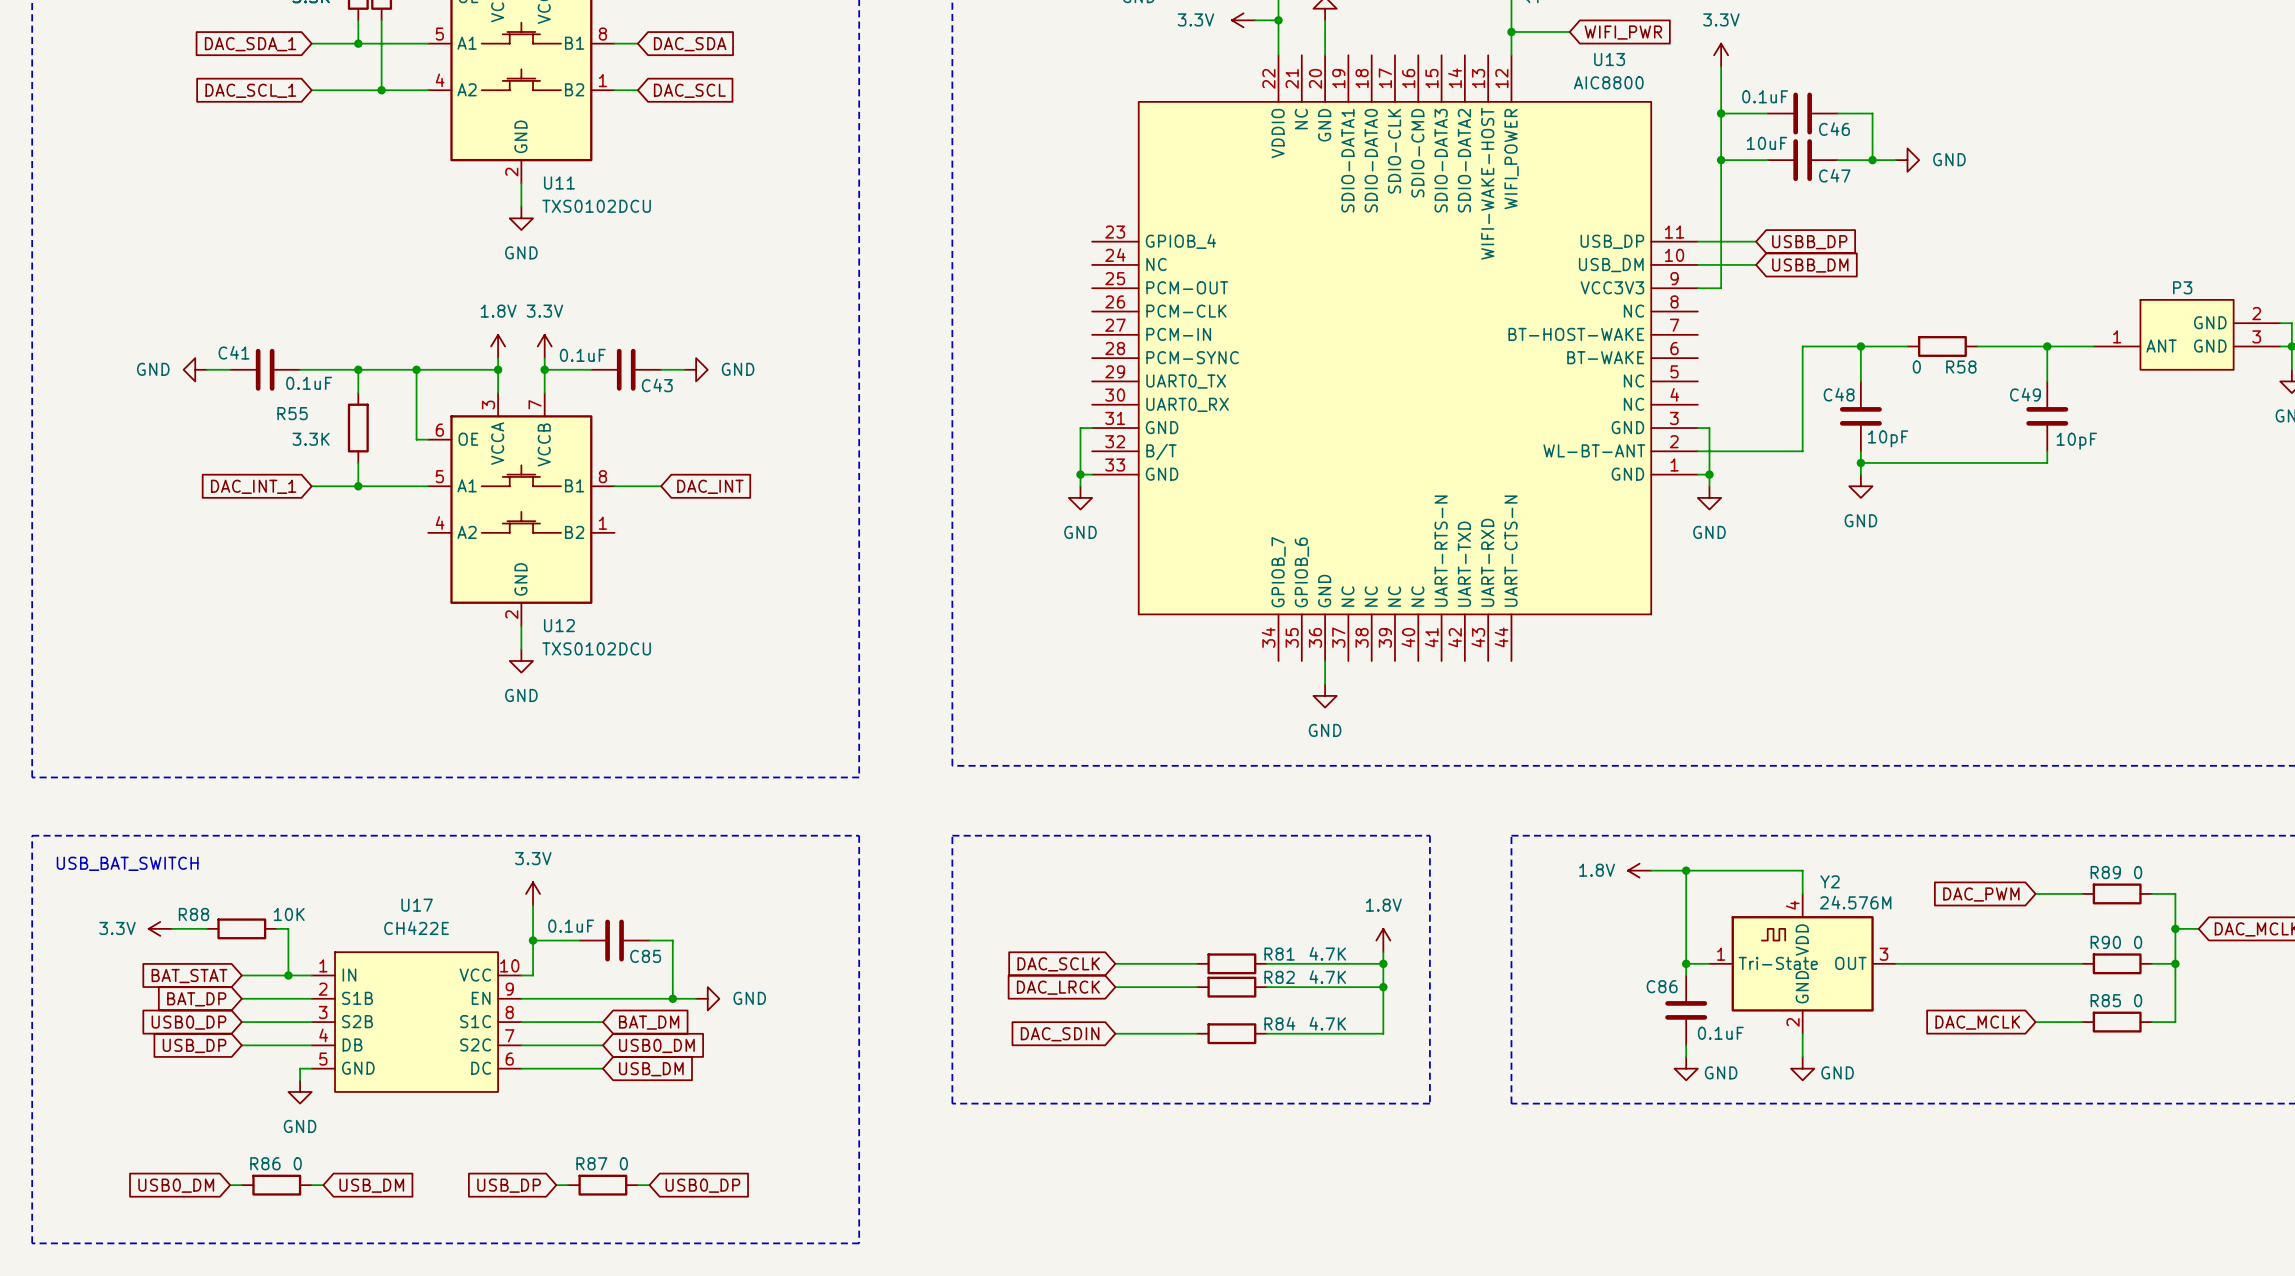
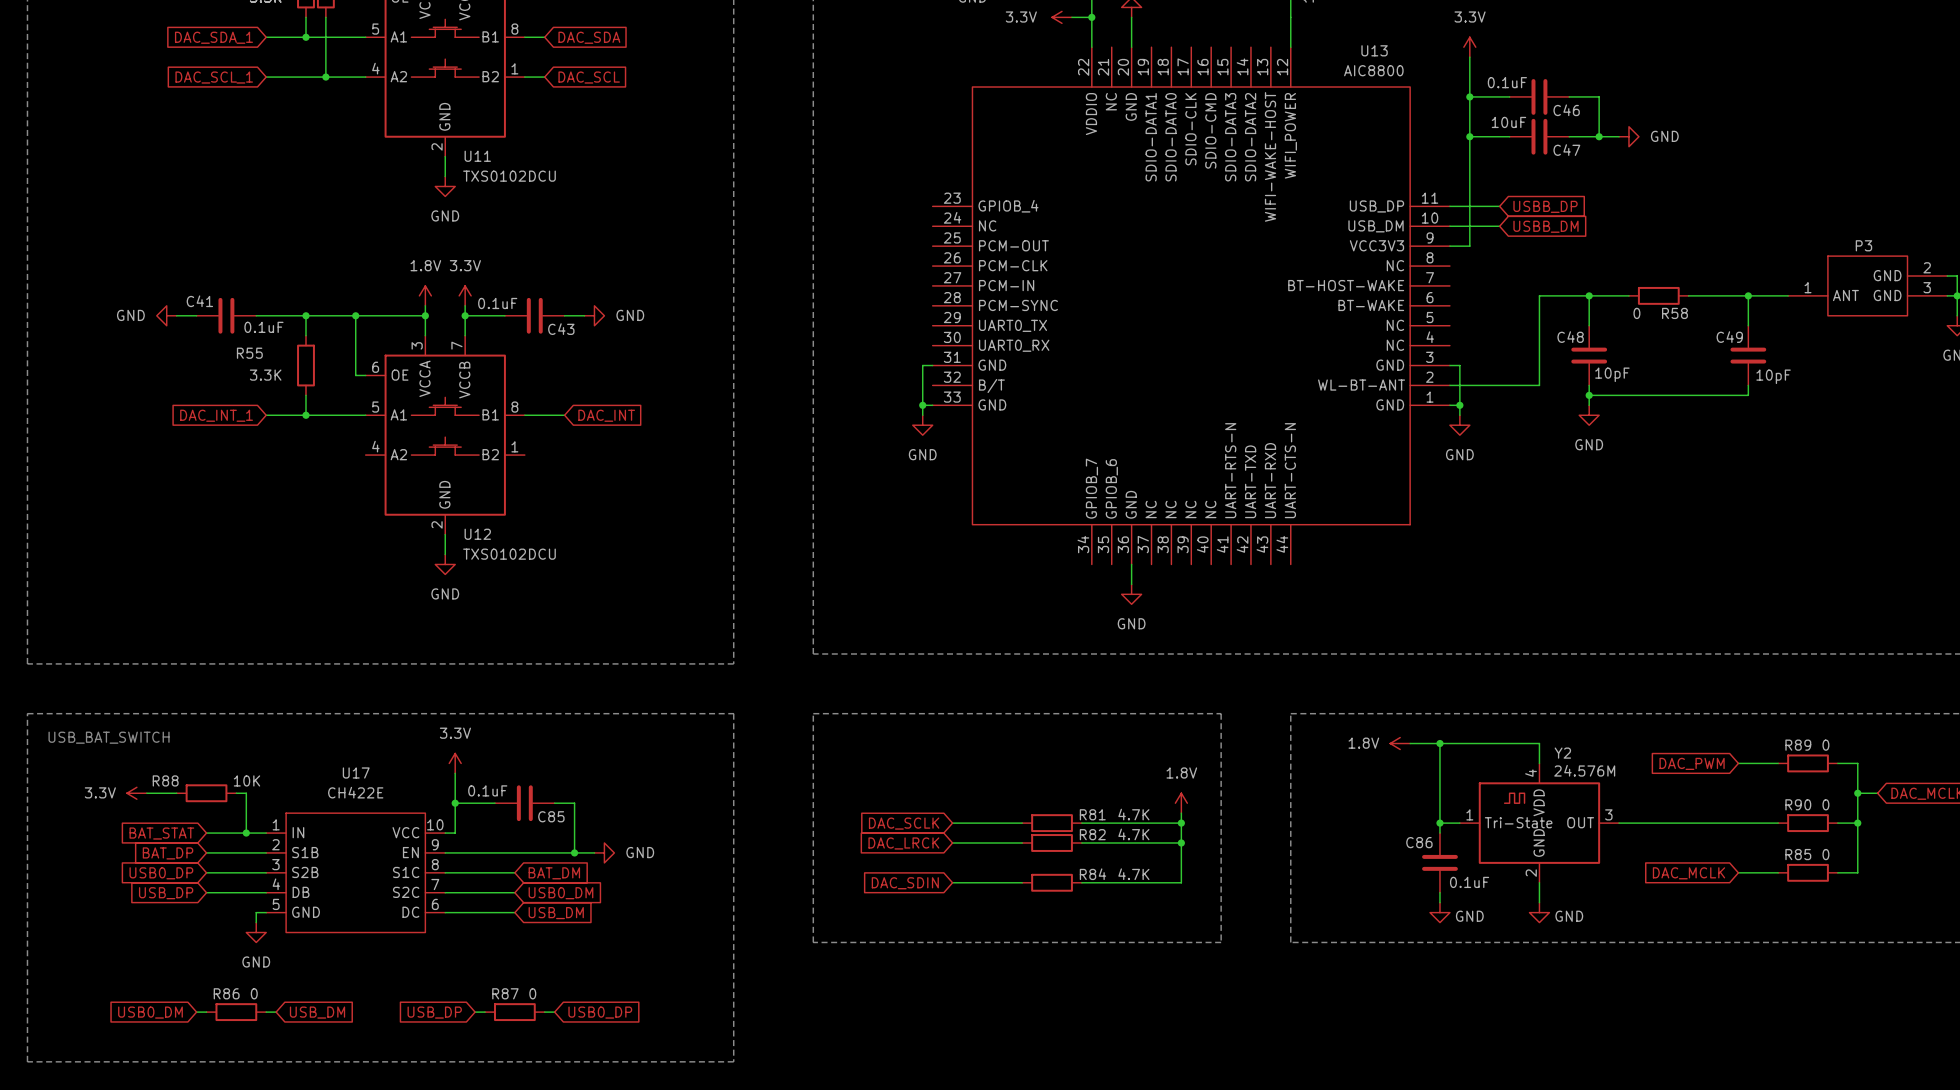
wire: (1511, 31) (1569, 31) -> none
junction: (1511, 31) -> none
global label: WIFI_PWR (1623, 32) -> none

